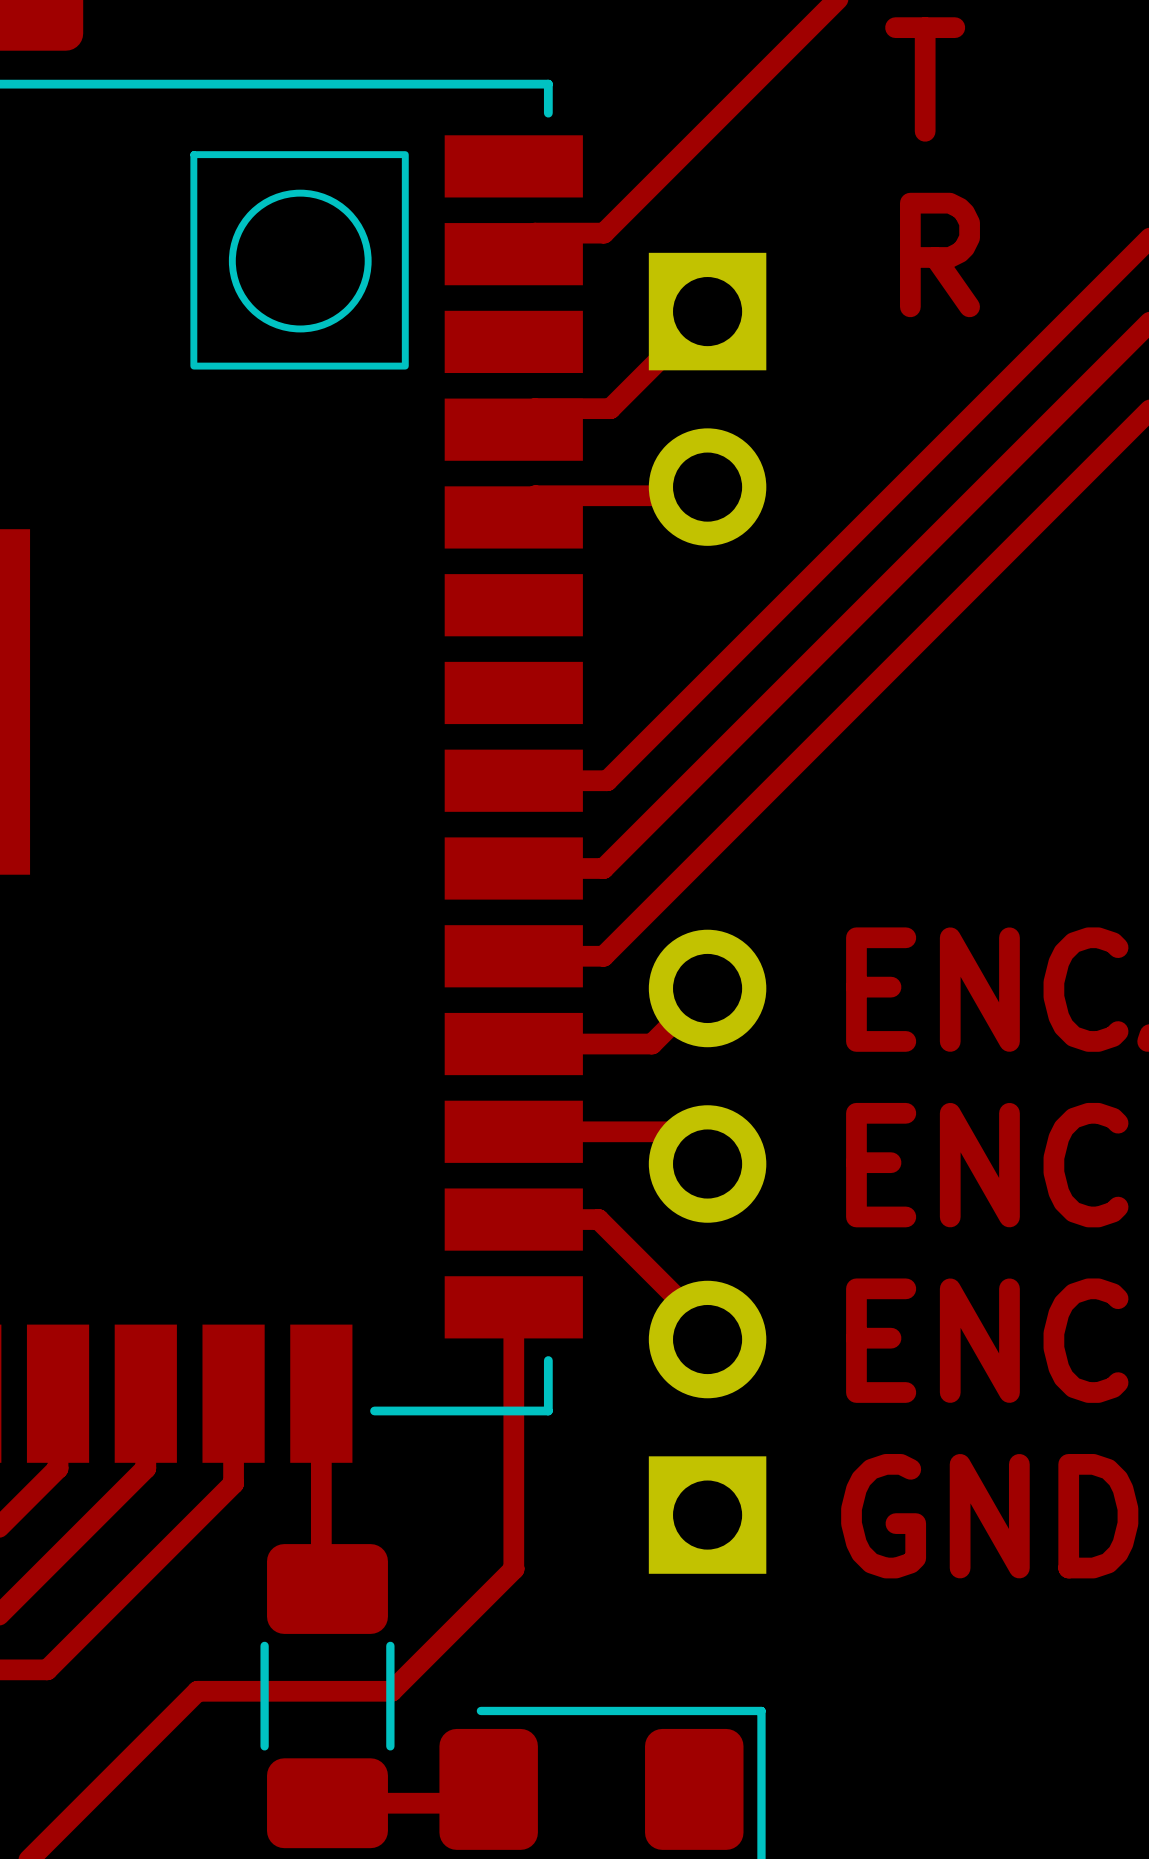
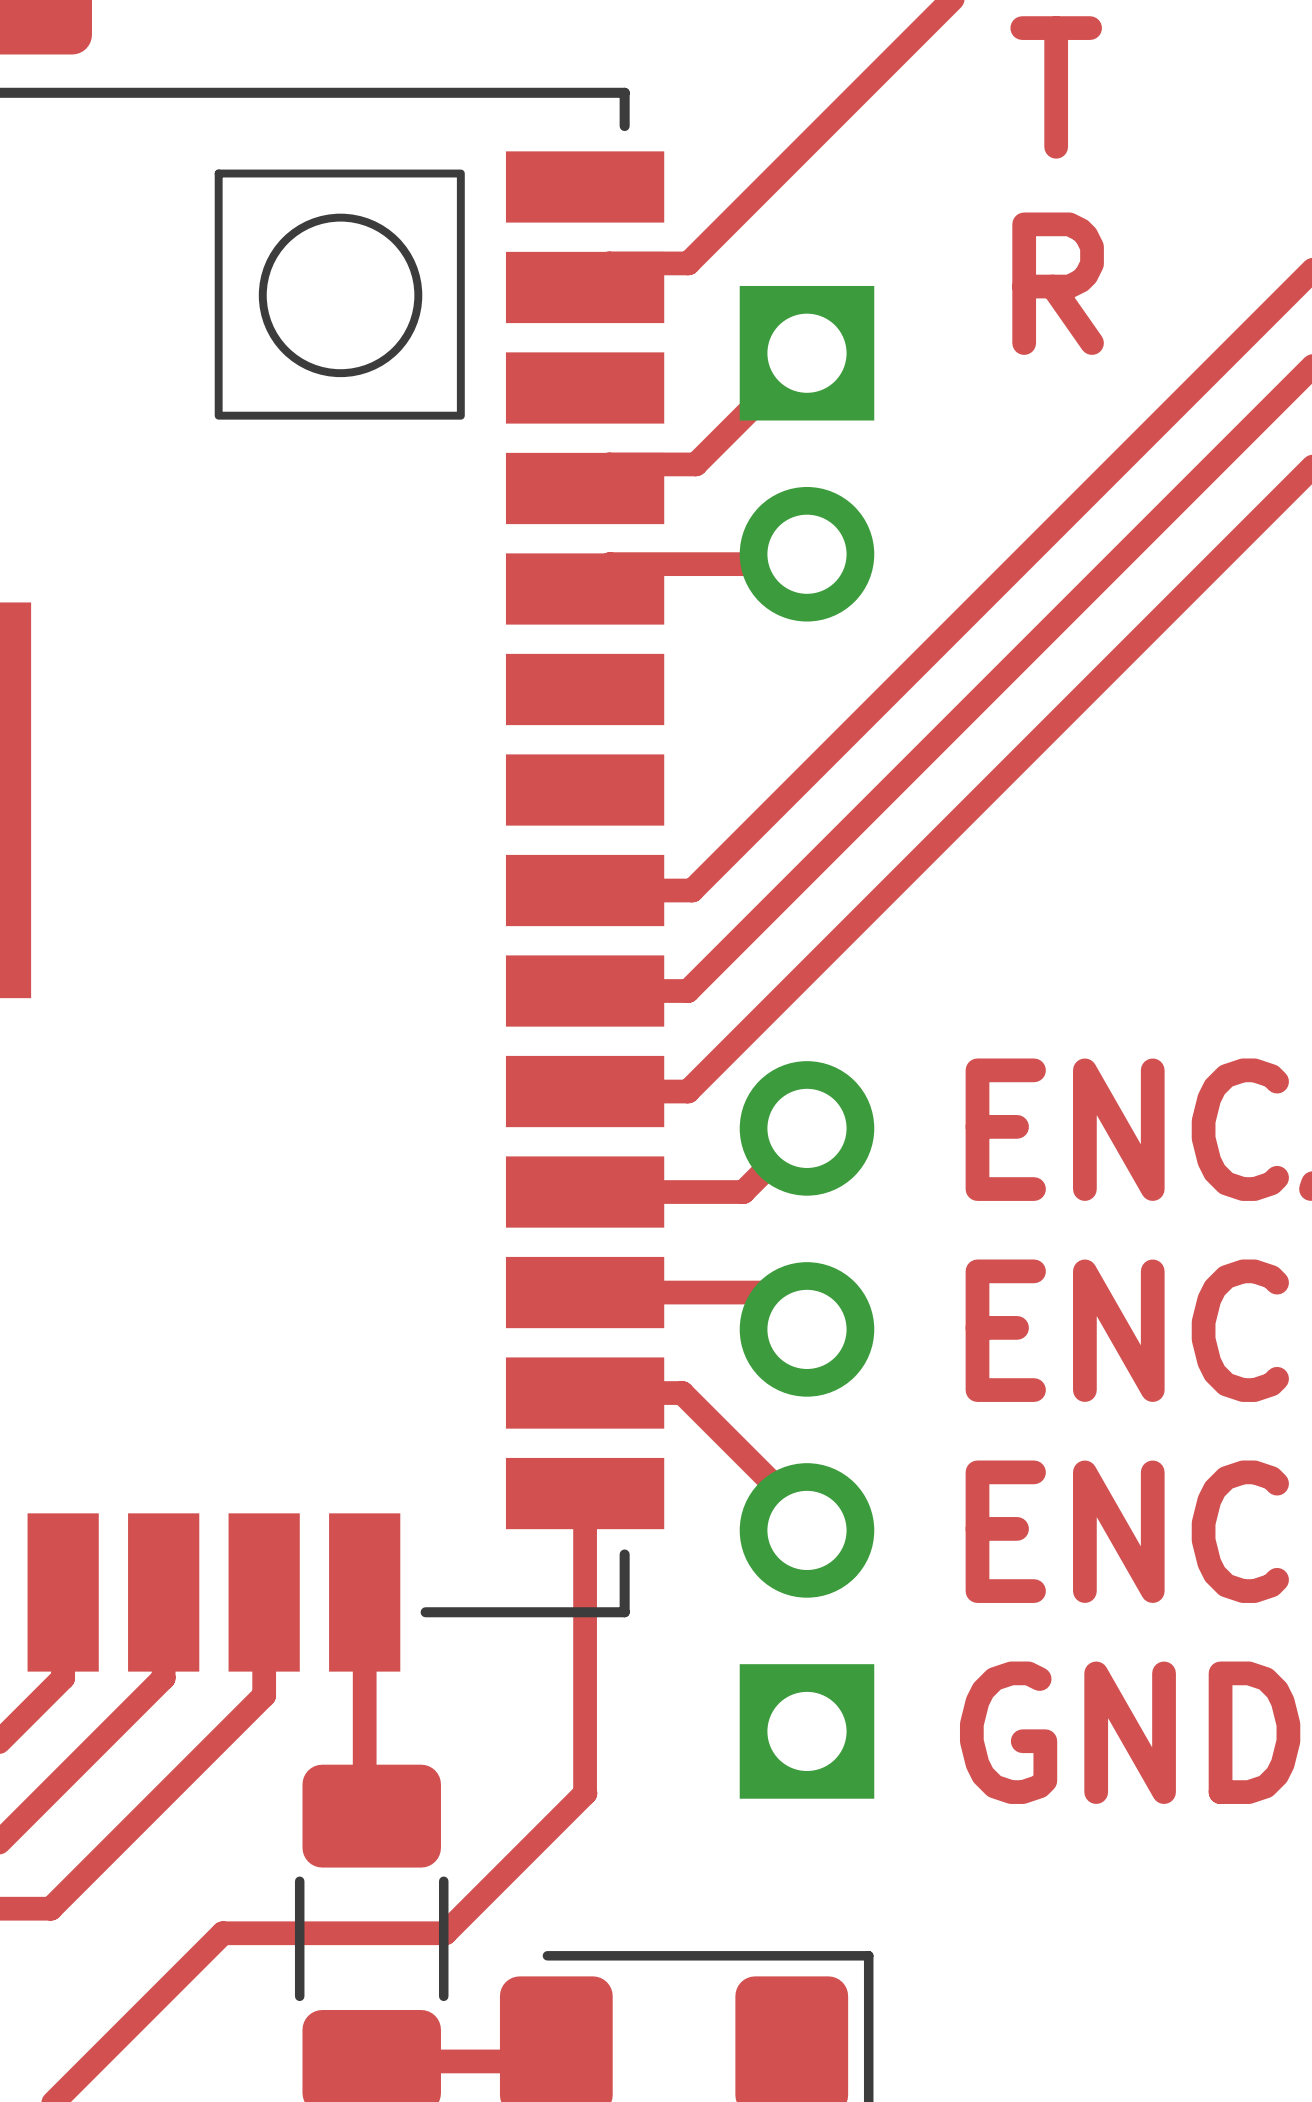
text position: R (939, 255) -> R (1058, 283)

